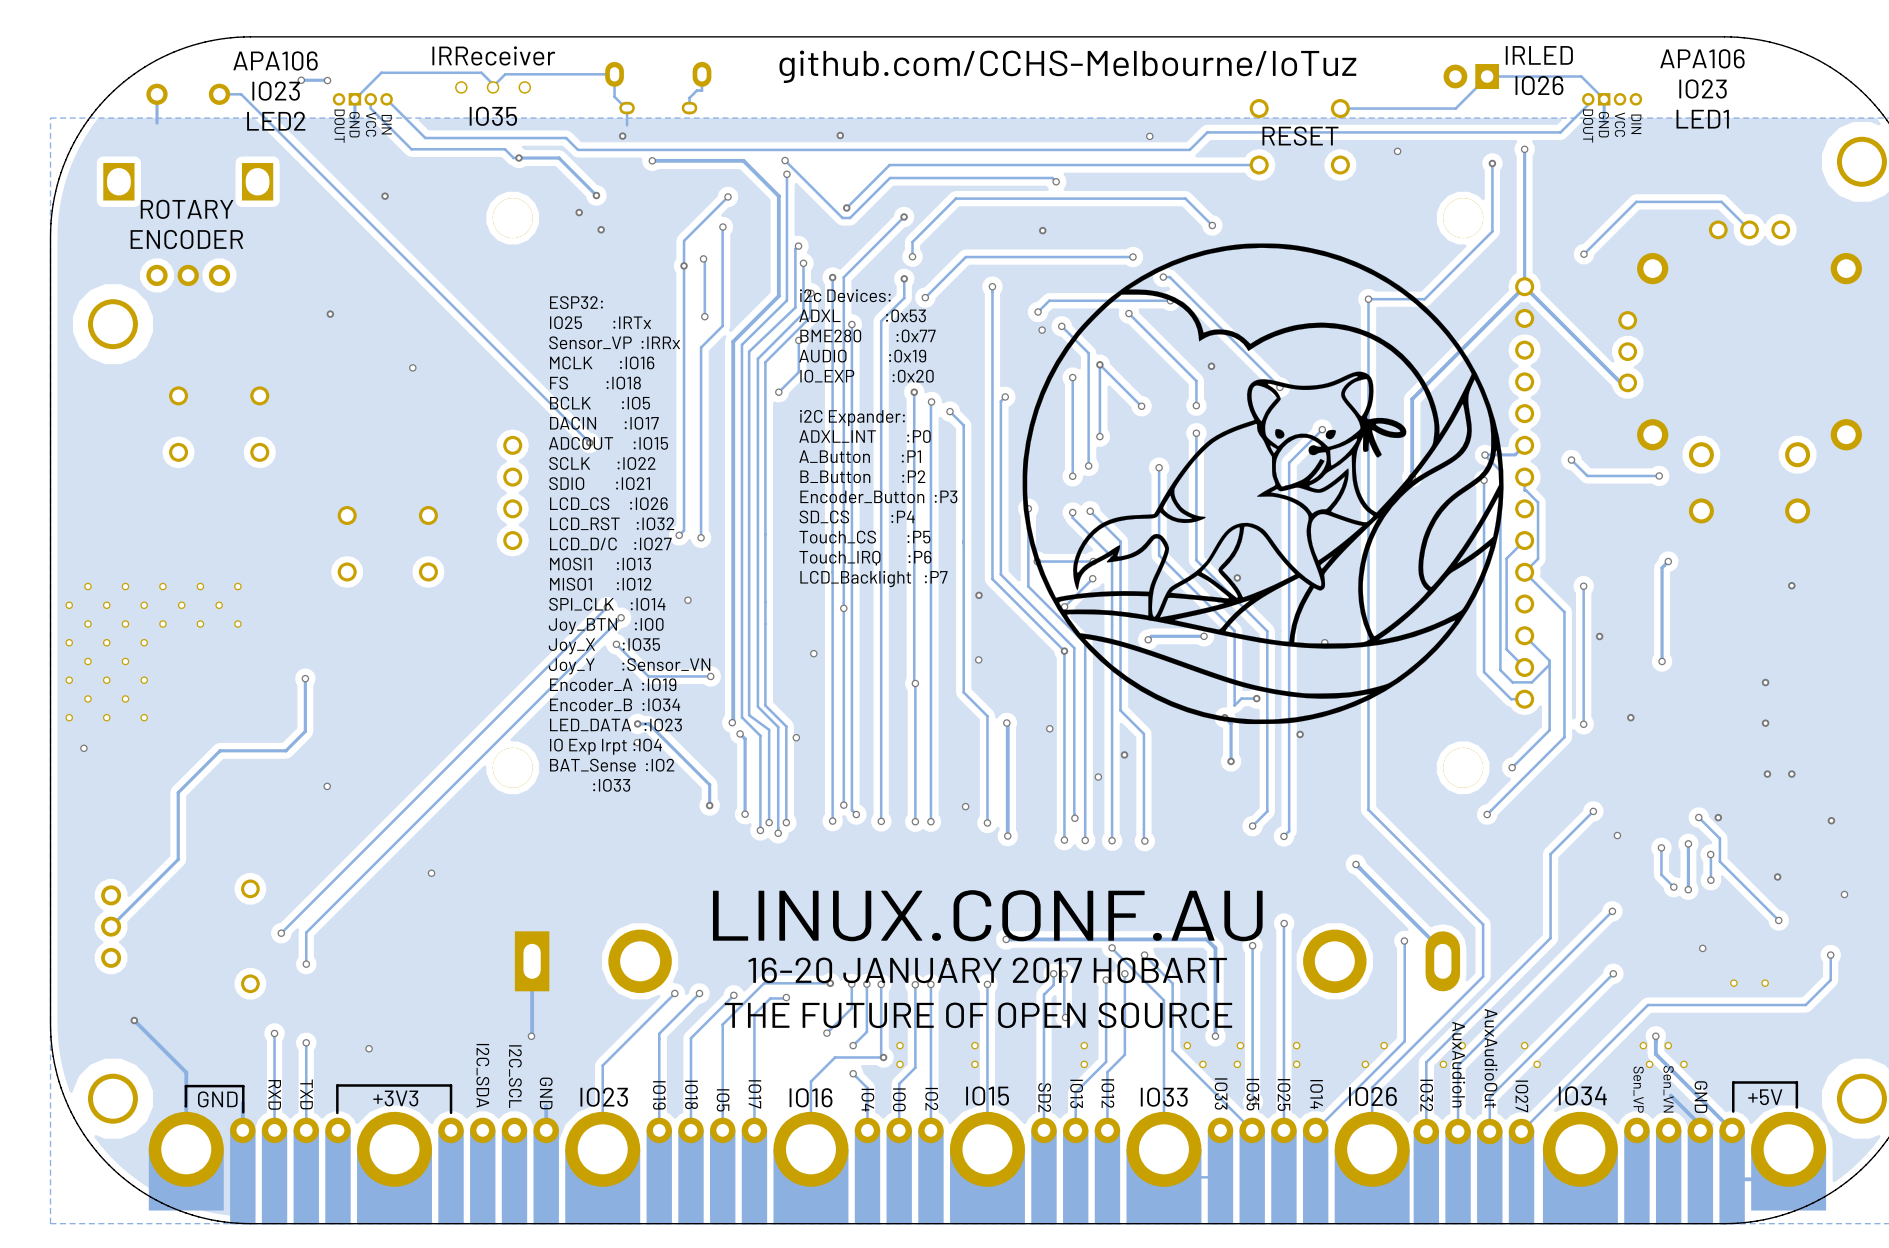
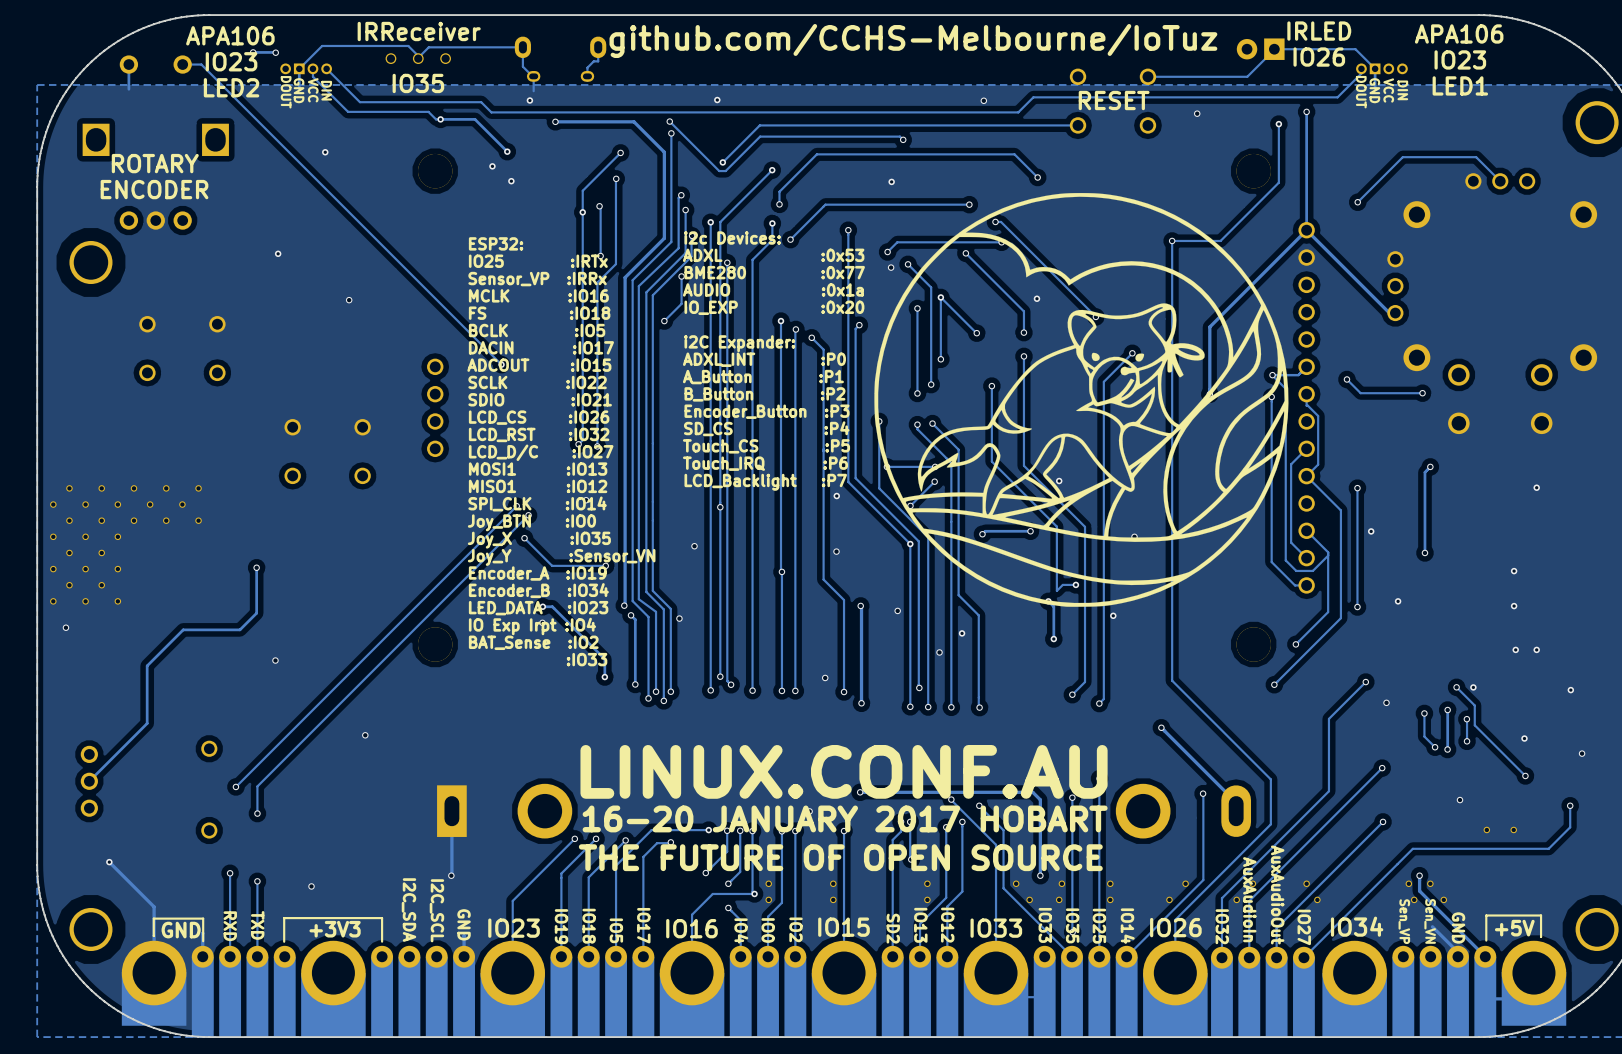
text: AUDIO :0x19 (862, 356) -> AUDIO :0x1a (773, 289)

